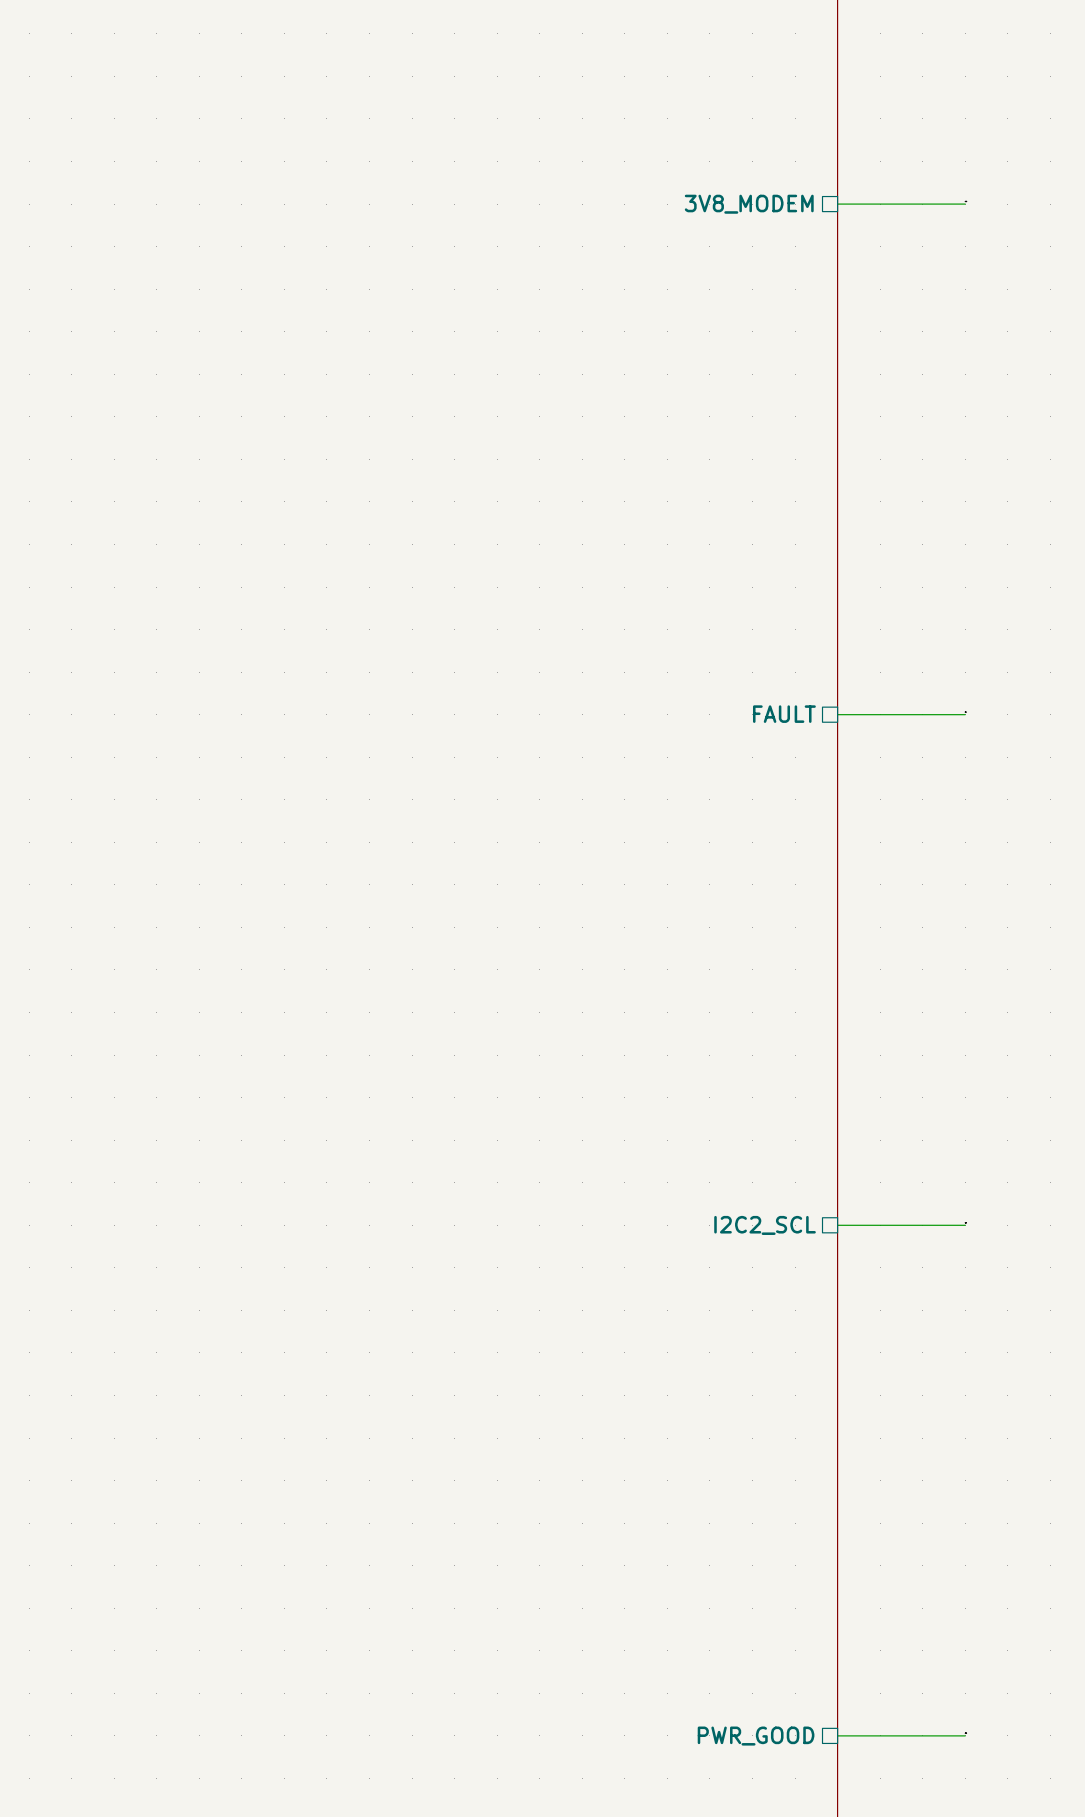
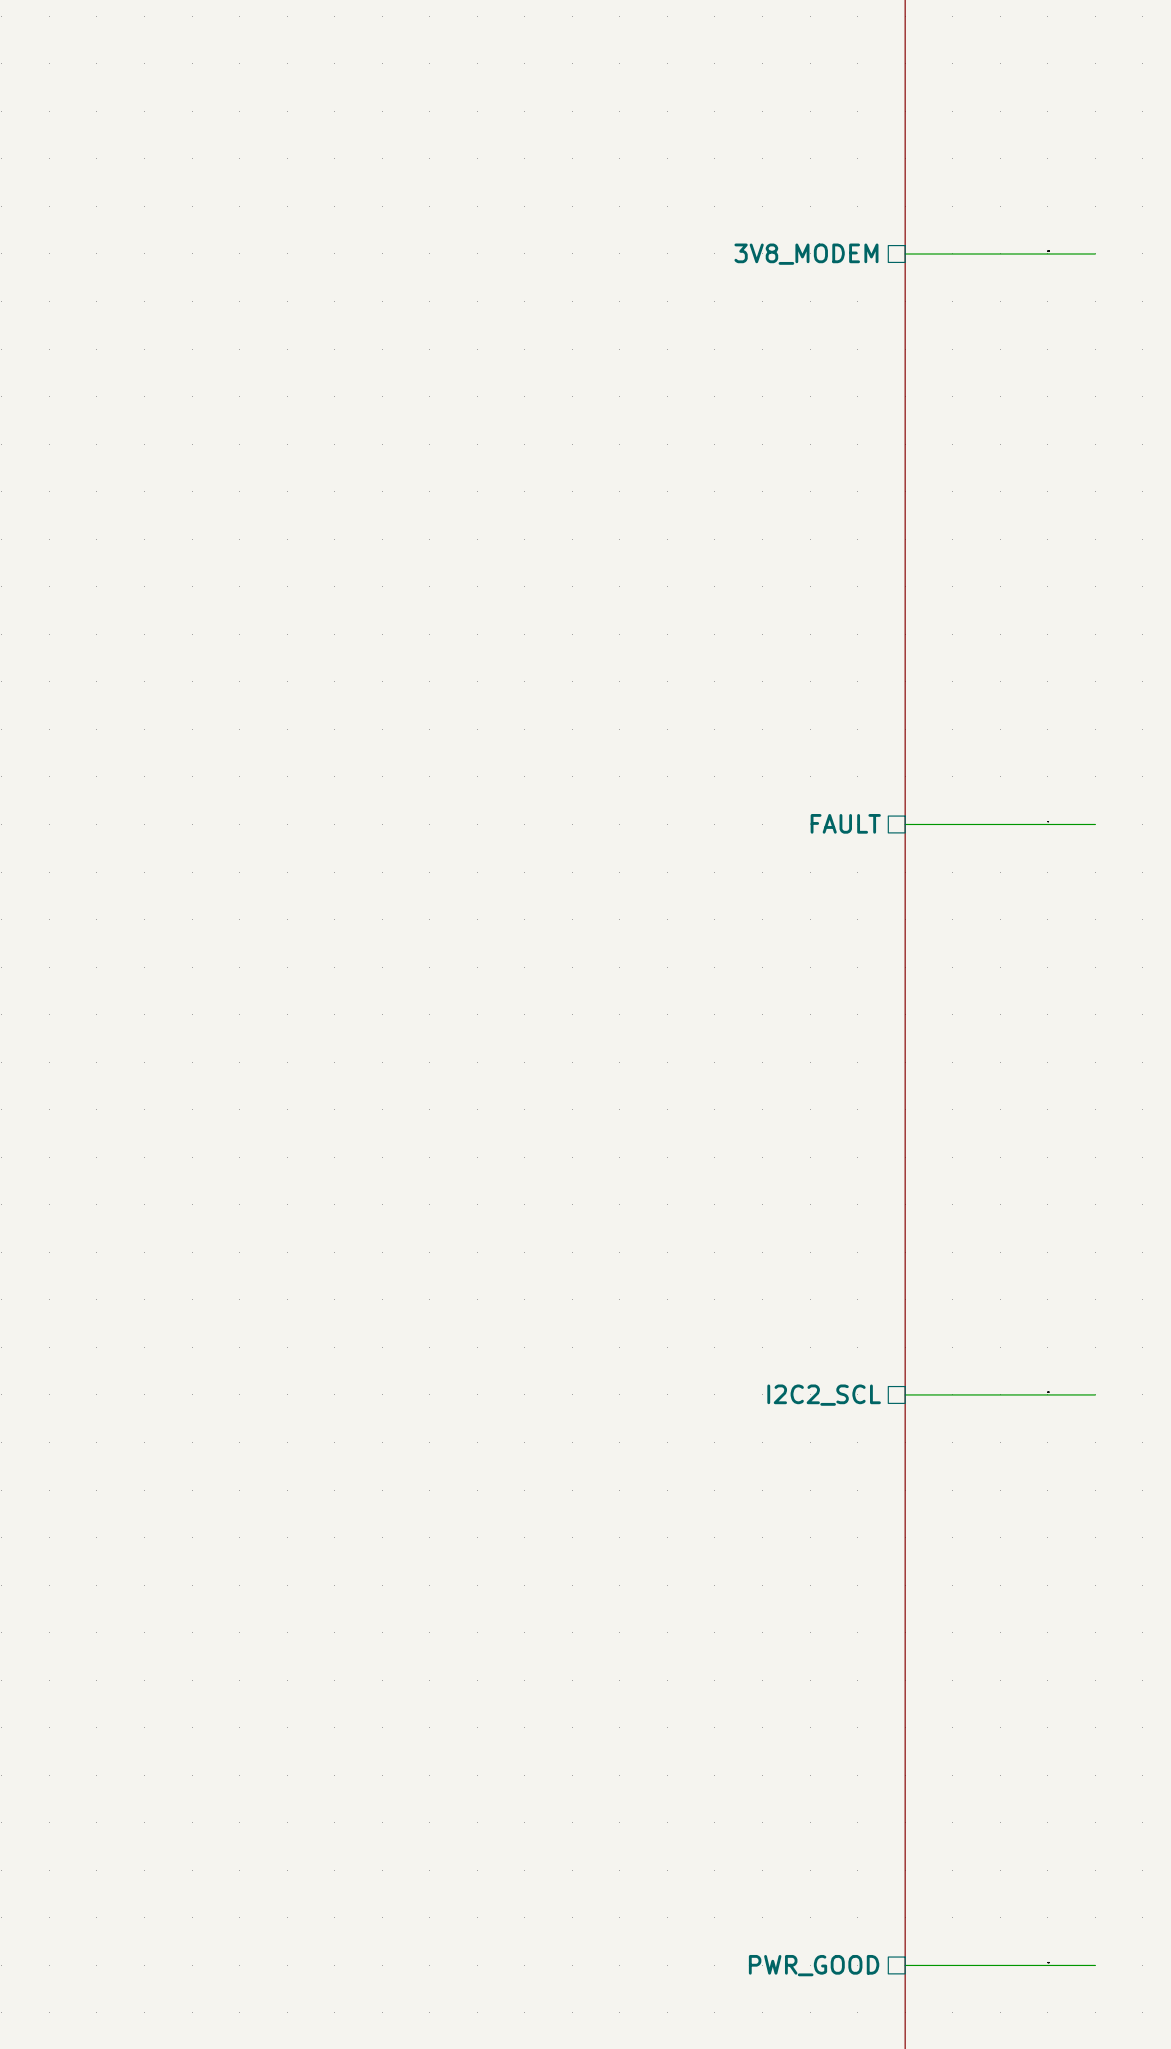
wire: none -> (1047, 253) (1095, 253)
wire: none -> (1047, 824) (1095, 824)
wire: none -> (1047, 1394) (1095, 1394)
wire: none -> (1047, 1965) (1095, 1965)

